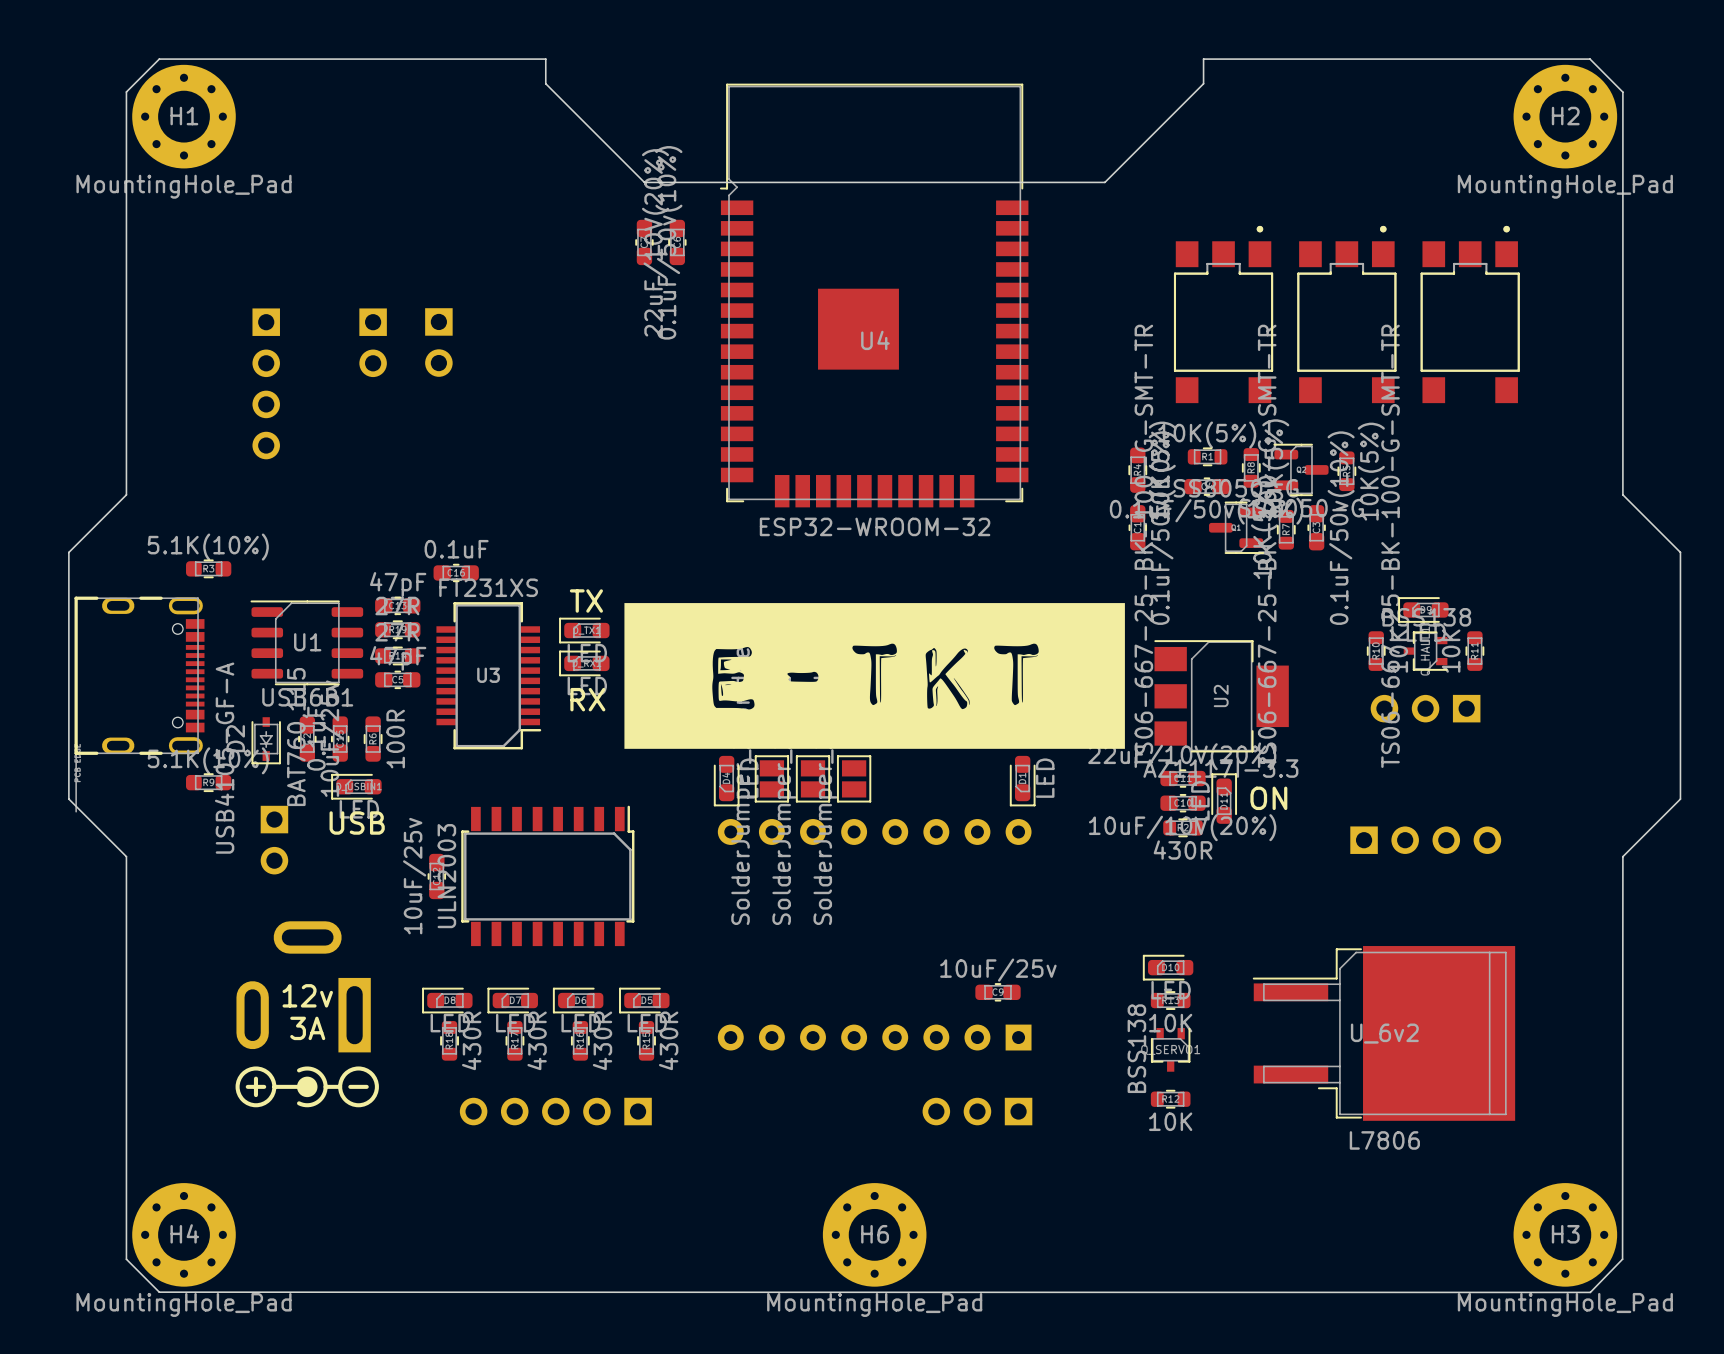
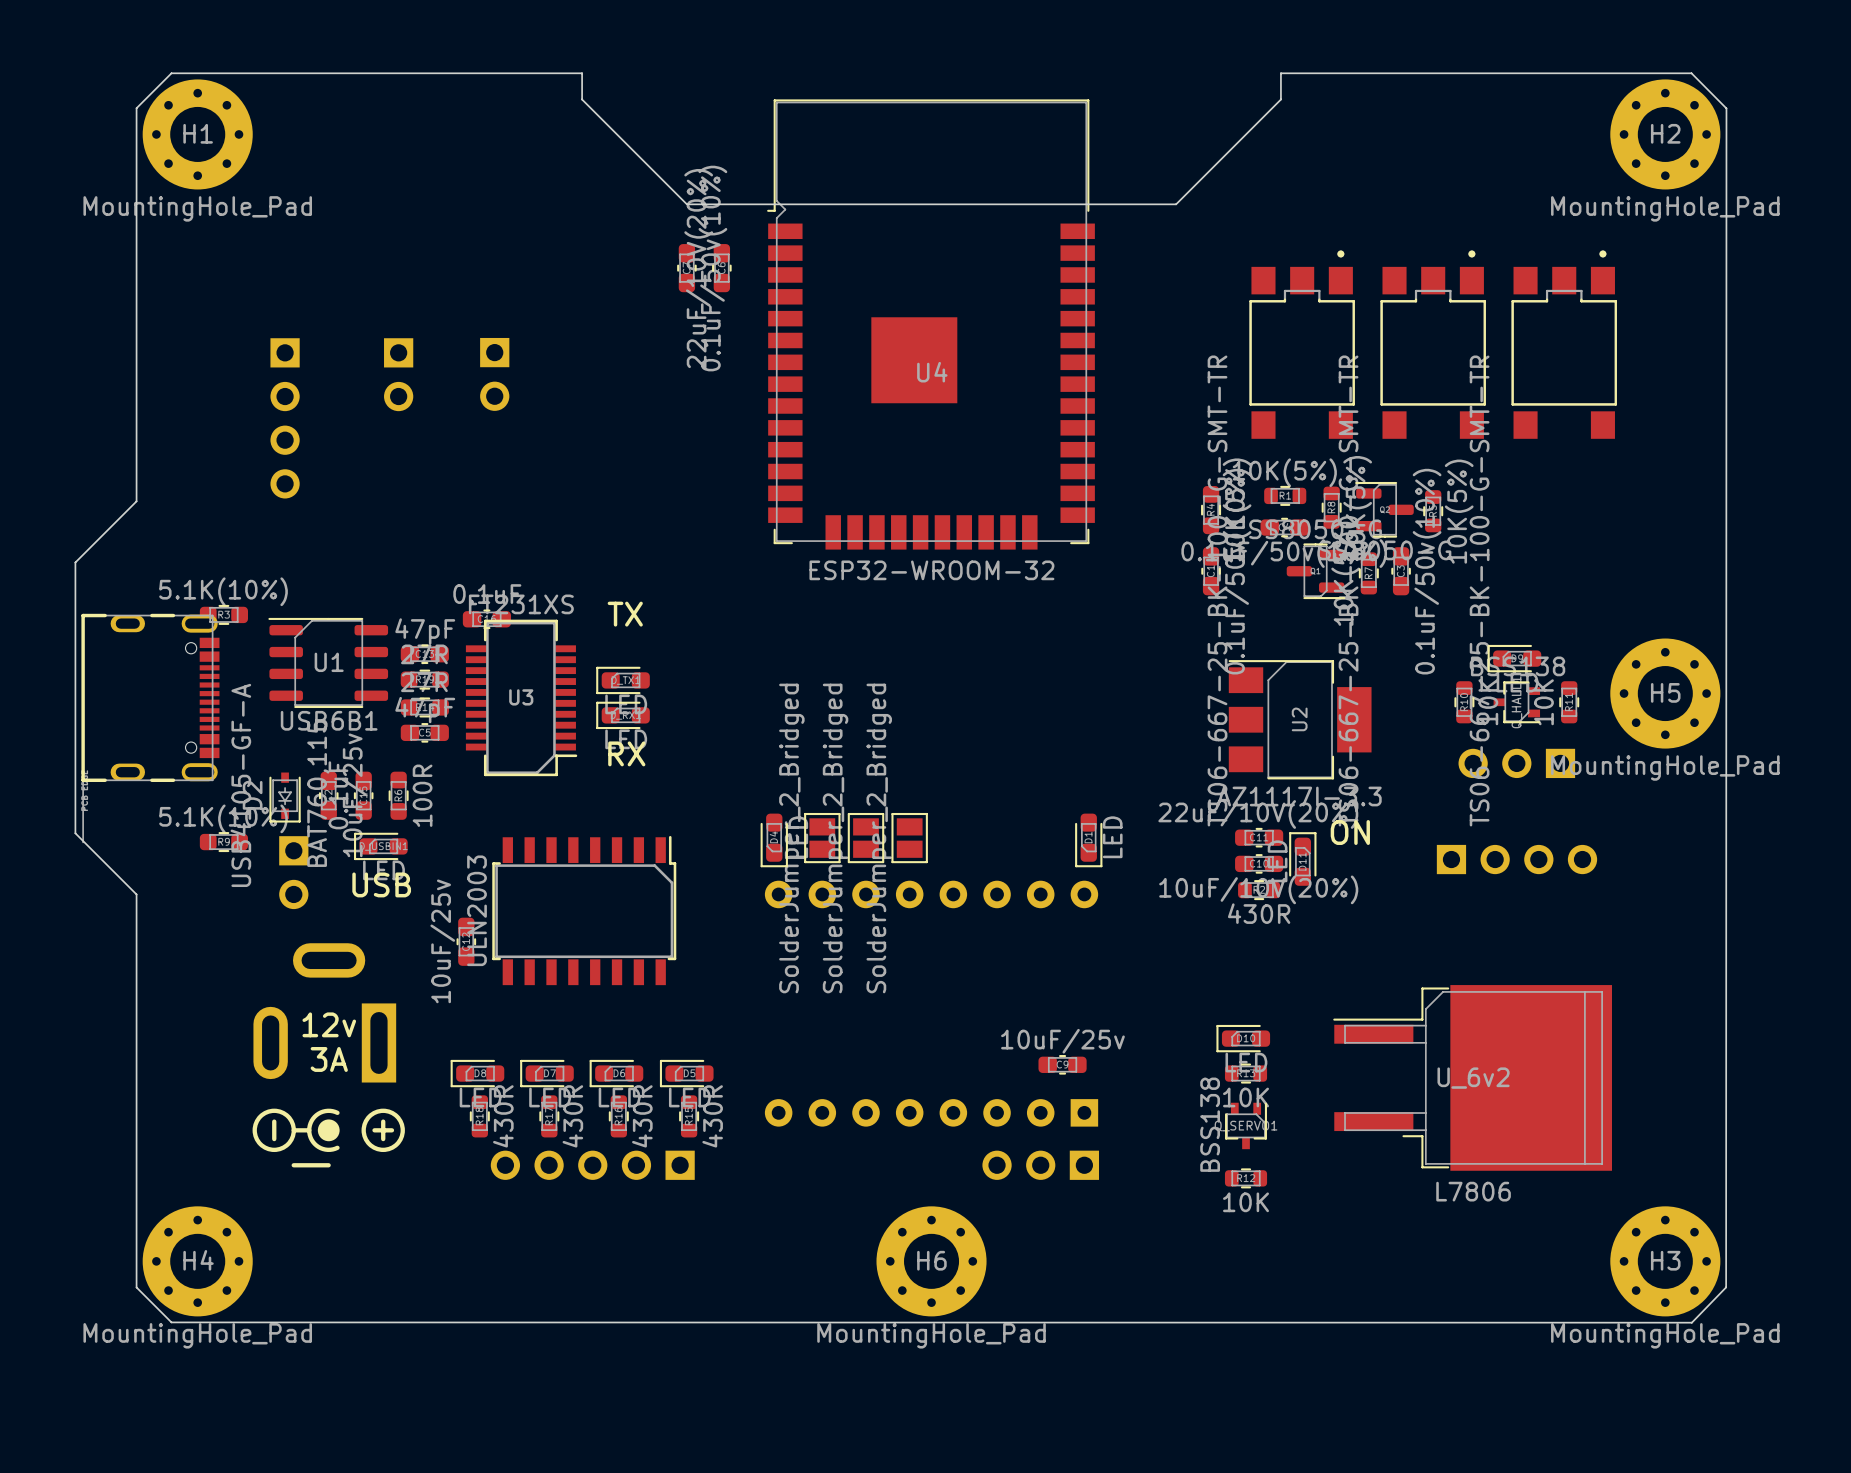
board edge: (1622, 92) (1622, 494) (1680, 552) (1680, 799) (1622, 856) (1622, 1259) (1590, 1292) (159, 1292) (126, 1259) (126, 1201) -> (1726, 108) (1726, 1287) (1691, 1322) (171, 1322) (136, 1287)
part position: (438, 342) -> (494, 374)
board edge: (126, 461) (126, 494) (68, 552) -> (136, 501) (75, 562) (75, 597)
text position: TX (586, 601) -> TX (625, 614)
drawing: [624, 603, 1125, 749] -> none
U1 position: (306, 642) -> (328, 662)
H5: none -> MountingHole_Pad (1665, 693)
U3 position: (488, 675) -> (521, 697)
U2 position: (1221, 696) -> (1300, 719)
part position: (139, 704) -> (150, 728)
board edge: (68, 774) (68, 799) (126, 856) -> (75, 833) (136, 894) (136, 920)
text position: ON (1268, 798) -> ON (1350, 832)
part position: (274, 840) -> (293, 872)
part position: (1425, 840) -> (1516, 859)
part position: (547, 875) -> (584, 910)
part position: (303, 986) -> (324, 1012)
text position: 12v (307, 995) -> 12v (329, 1024)
text position: 3A (307, 1028) -> 3A (329, 1059)
U_6v2 position: (1383, 1033) -> (1472, 1077)
line: none -> (337, 1112) (327, 1110) (318, 1113) (311, 1120) (309, 1130) (311, 1139) (318, 1146) (327, 1149) (337, 1147)
line: none -> (383, 1121) (383, 1139)
line: (299, 1070) (308, 1068) (316, 1071) (323, 1077) (325, 1086) (323, 1095) (316, 1102) (308, 1105) (299, 1103) -> none
line: (255, 1078) (255, 1095) -> (274, 1121) (274, 1139)
line: (247, 1086) (264, 1086) -> none
drawing position: (255, 1086) -> (274, 1130)
drawing position: (307, 1086) -> (328, 1130)
line: (325, 1086) (340, 1086) -> (293, 1130) (309, 1130)
line: (350, 1086) (366, 1086) -> (374, 1130) (391, 1130)
drawing position: (358, 1086) -> (383, 1130)
part position: (555, 1111) -> (592, 1165)
part position: (977, 1111) -> (1040, 1165)
H4 position: (184, 1234) -> (197, 1261)
H6 position: (874, 1234) -> (931, 1261)
H3 position: (1565, 1234) -> (1665, 1261)

